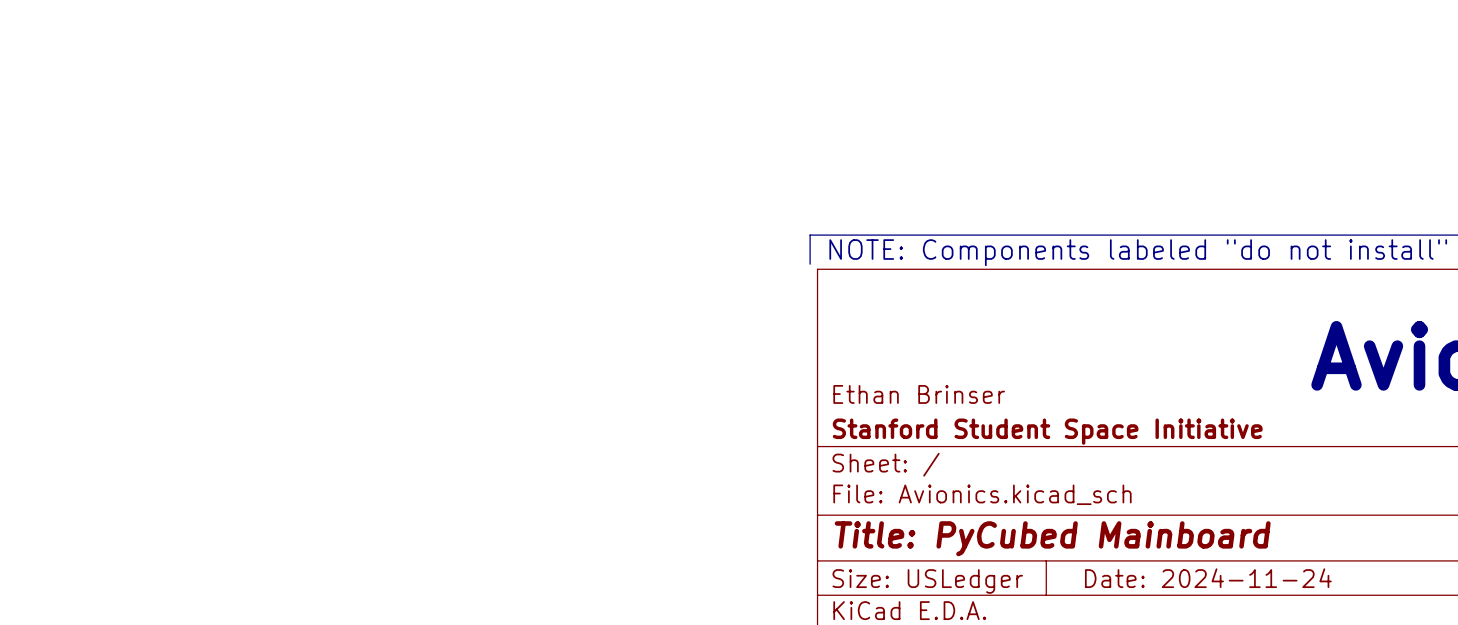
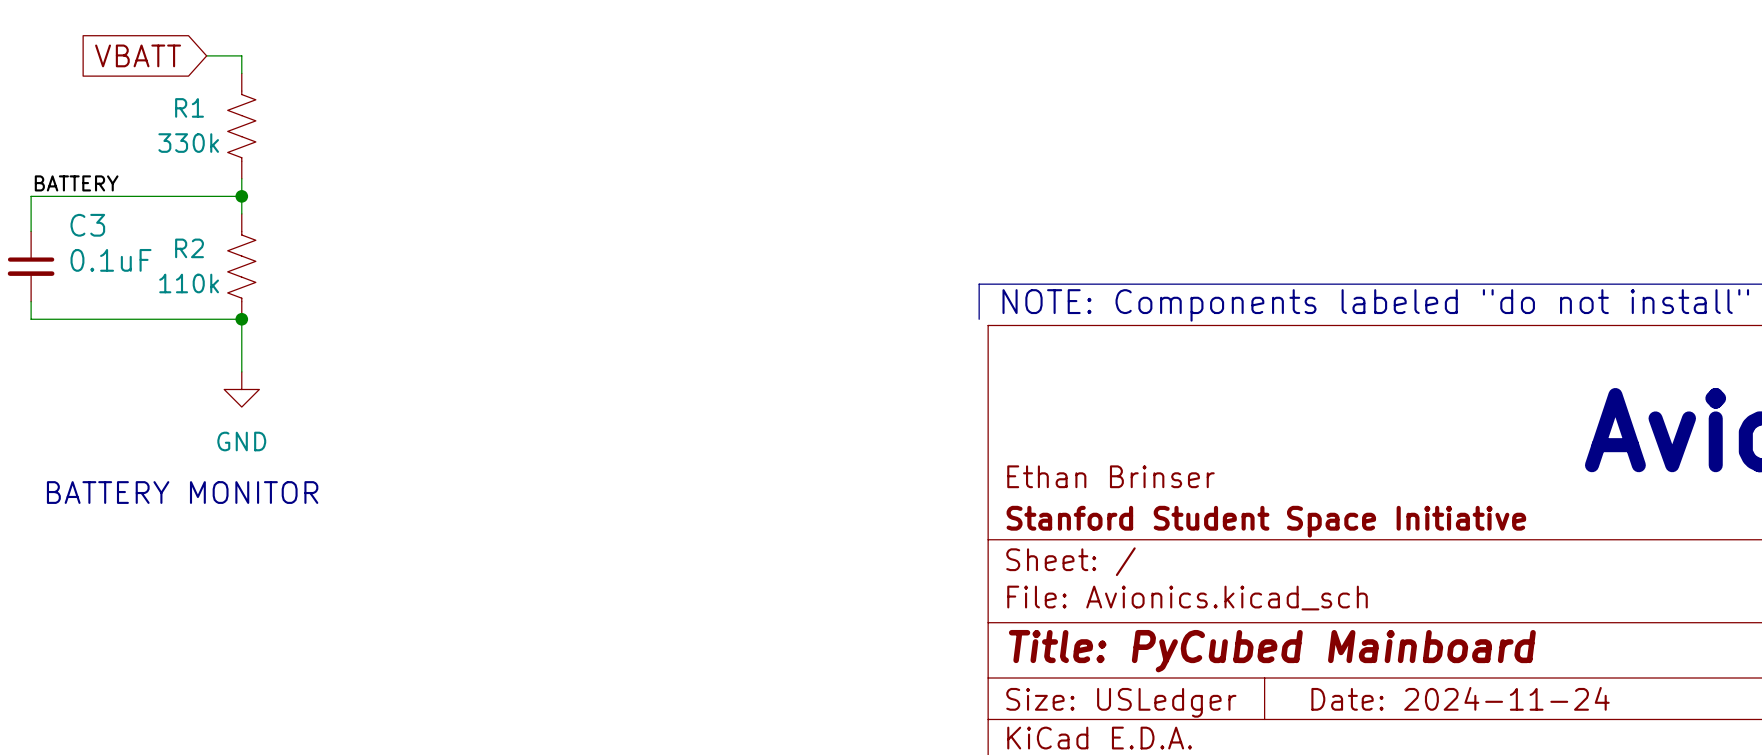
global label: none -> VBATT (138, 55)
wire: none -> (206, 55) (241, 55) (241, 73)
R1: none -> 330k (241, 126)
wire: none -> (241, 178) (241, 213)
label: none -> BATTERY (76, 183)
wire: none -> (241, 196) (31, 196) (31, 231)
junction: none -> (241, 196)
C3: none -> 0.1uF (31, 266)
R2: none -> 110k (241, 266)
wire: none -> (31, 301) (31, 319) (241, 319) (241, 371)
junction: none -> (241, 319)
power symbol: none -> GND (241, 389)
text: none -> BATTERY MONITOR (182, 492)

